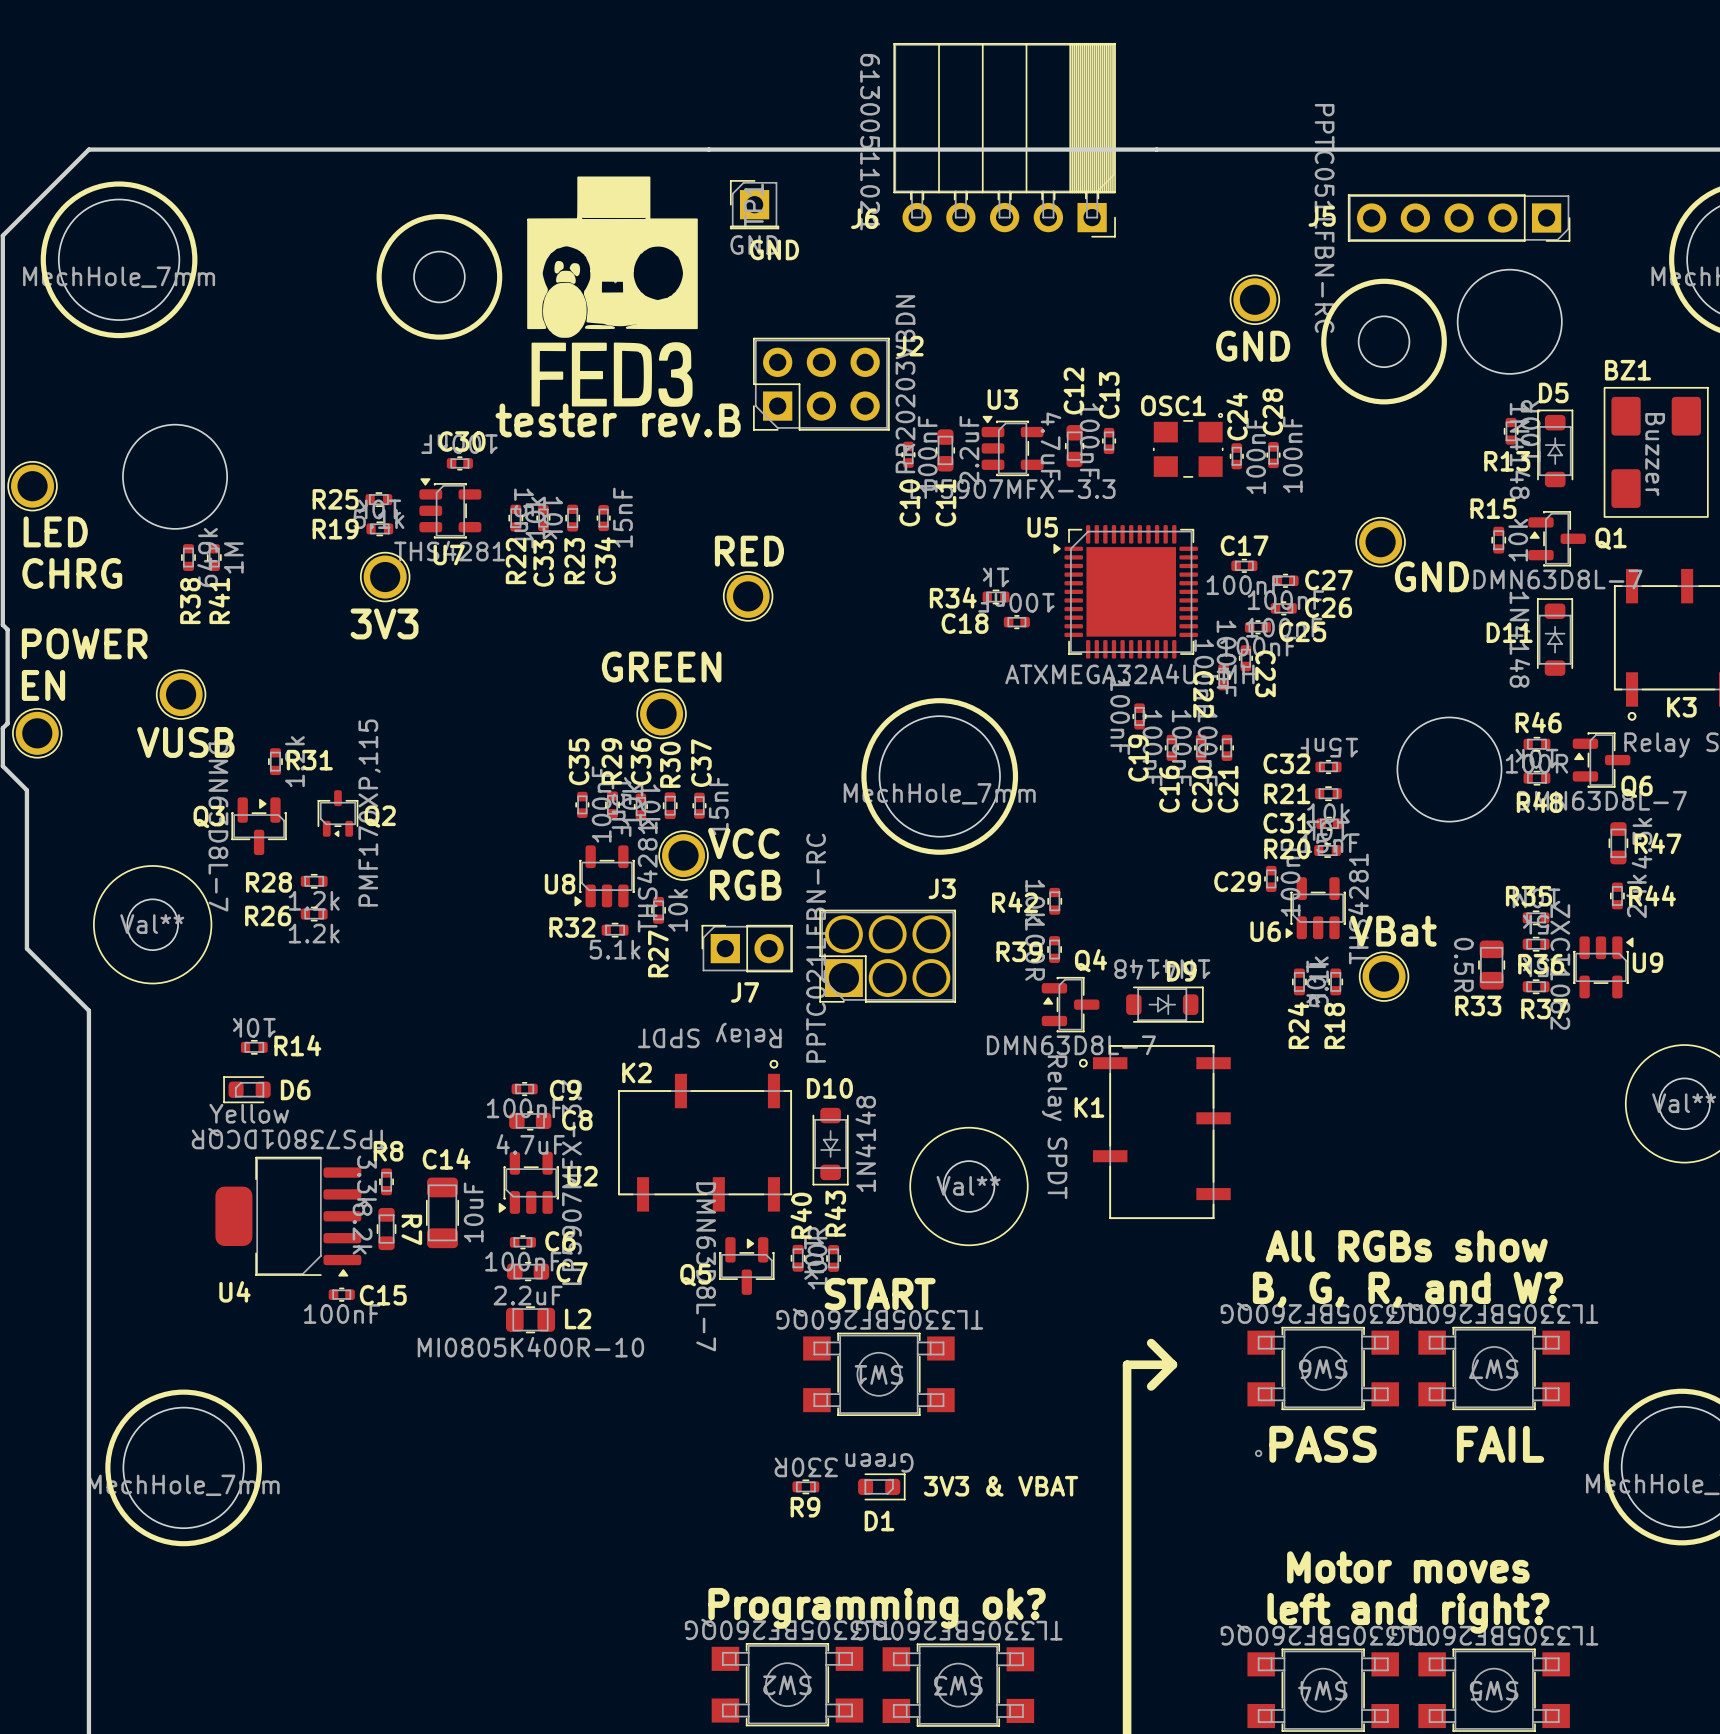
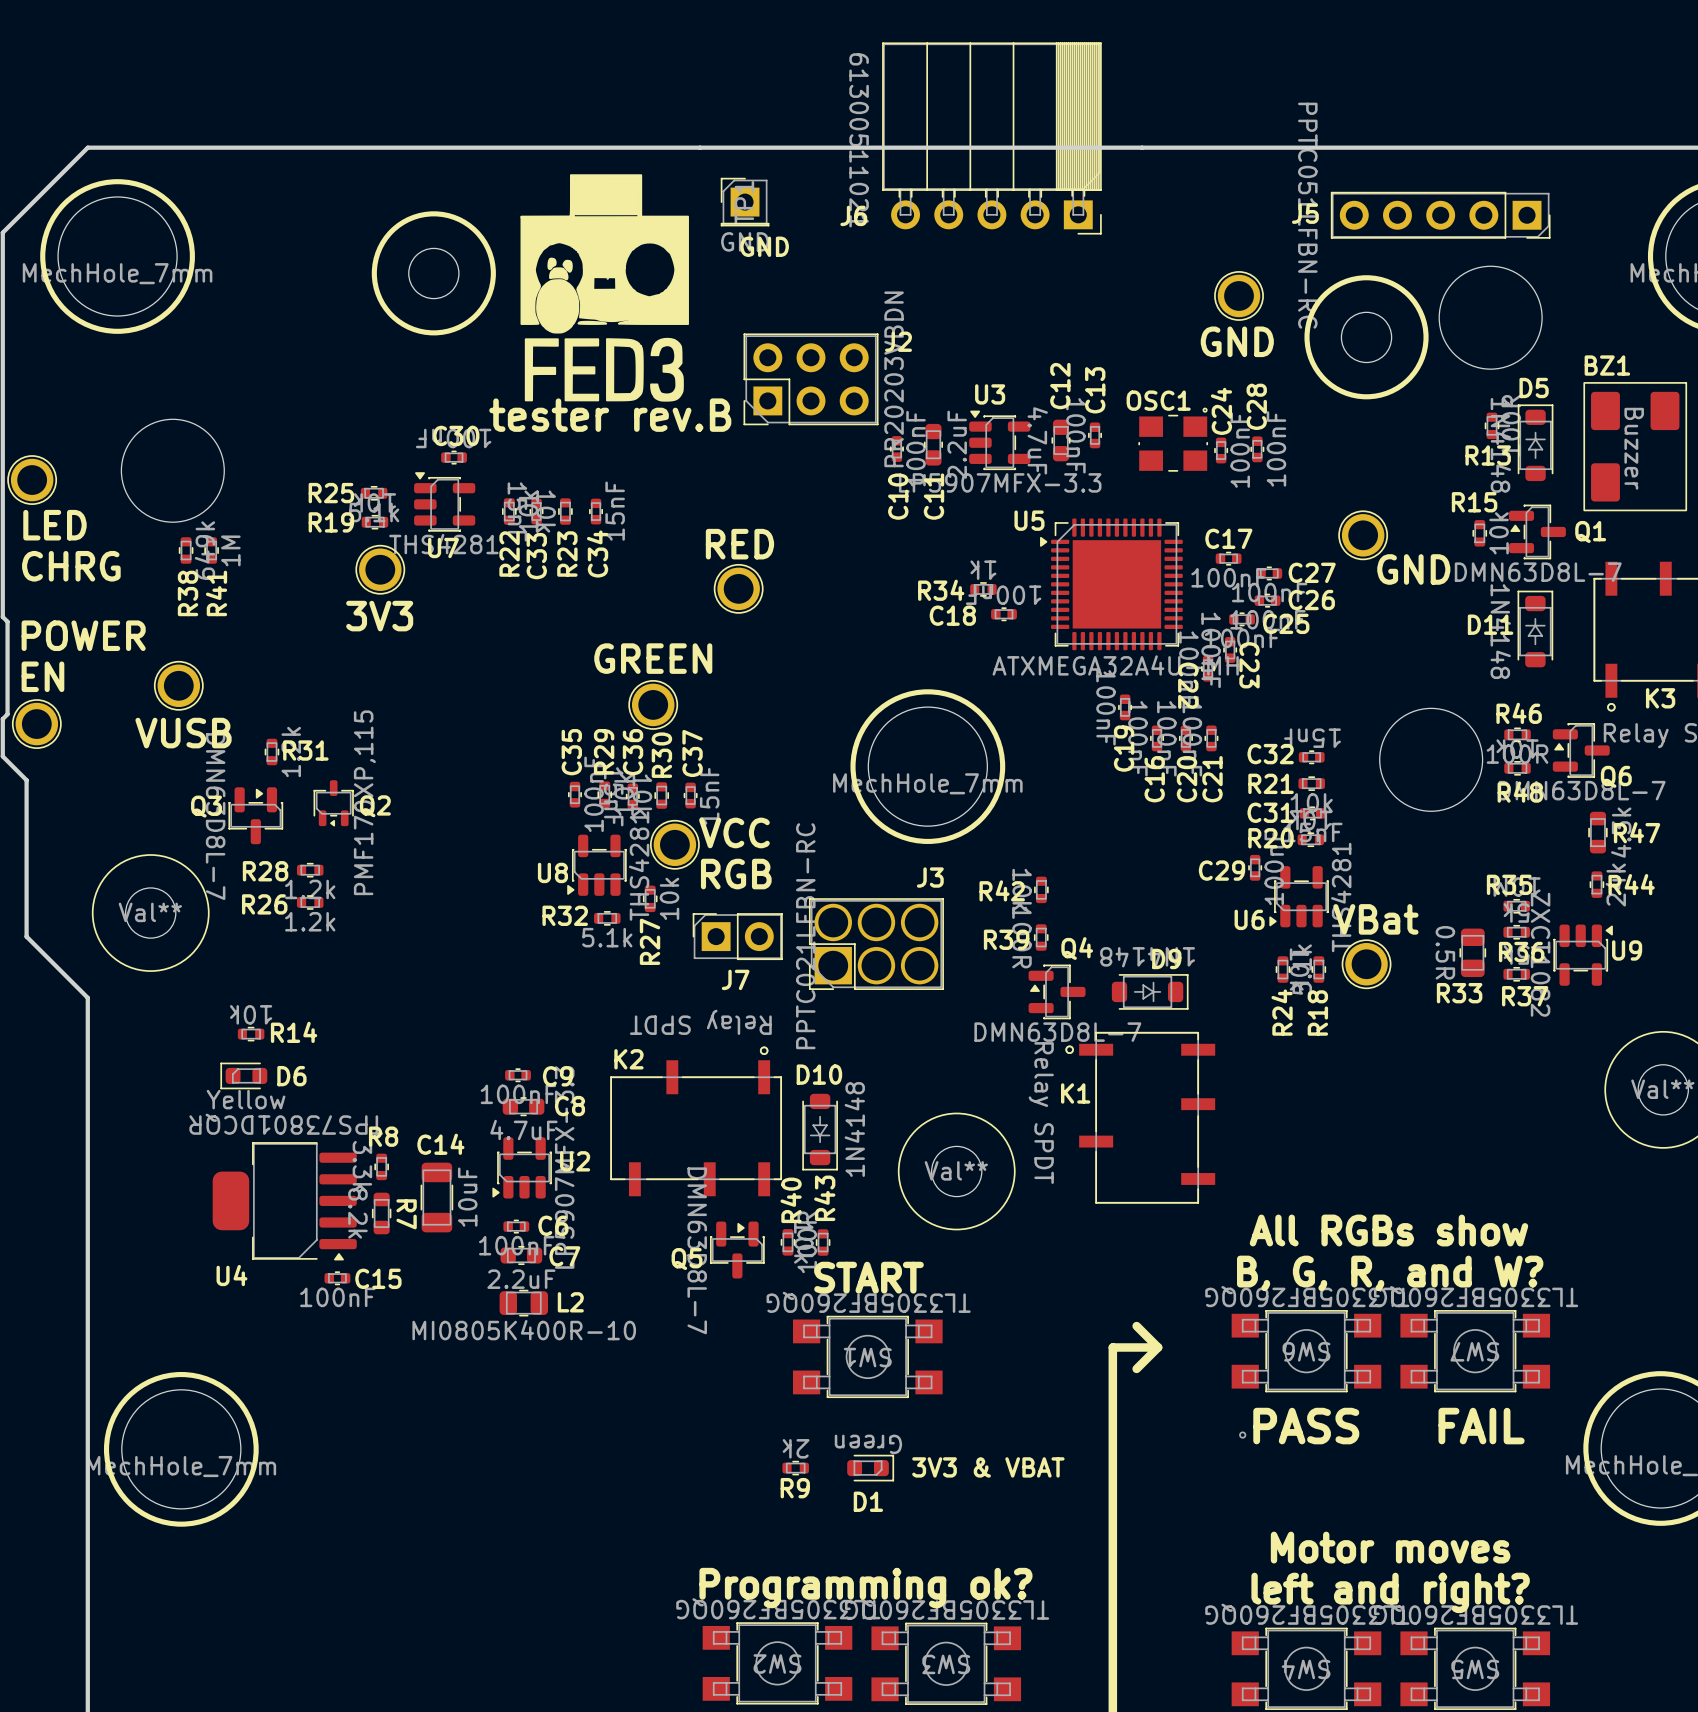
R9 value: 330R (806, 1467) -> 2k (796, 1448)

